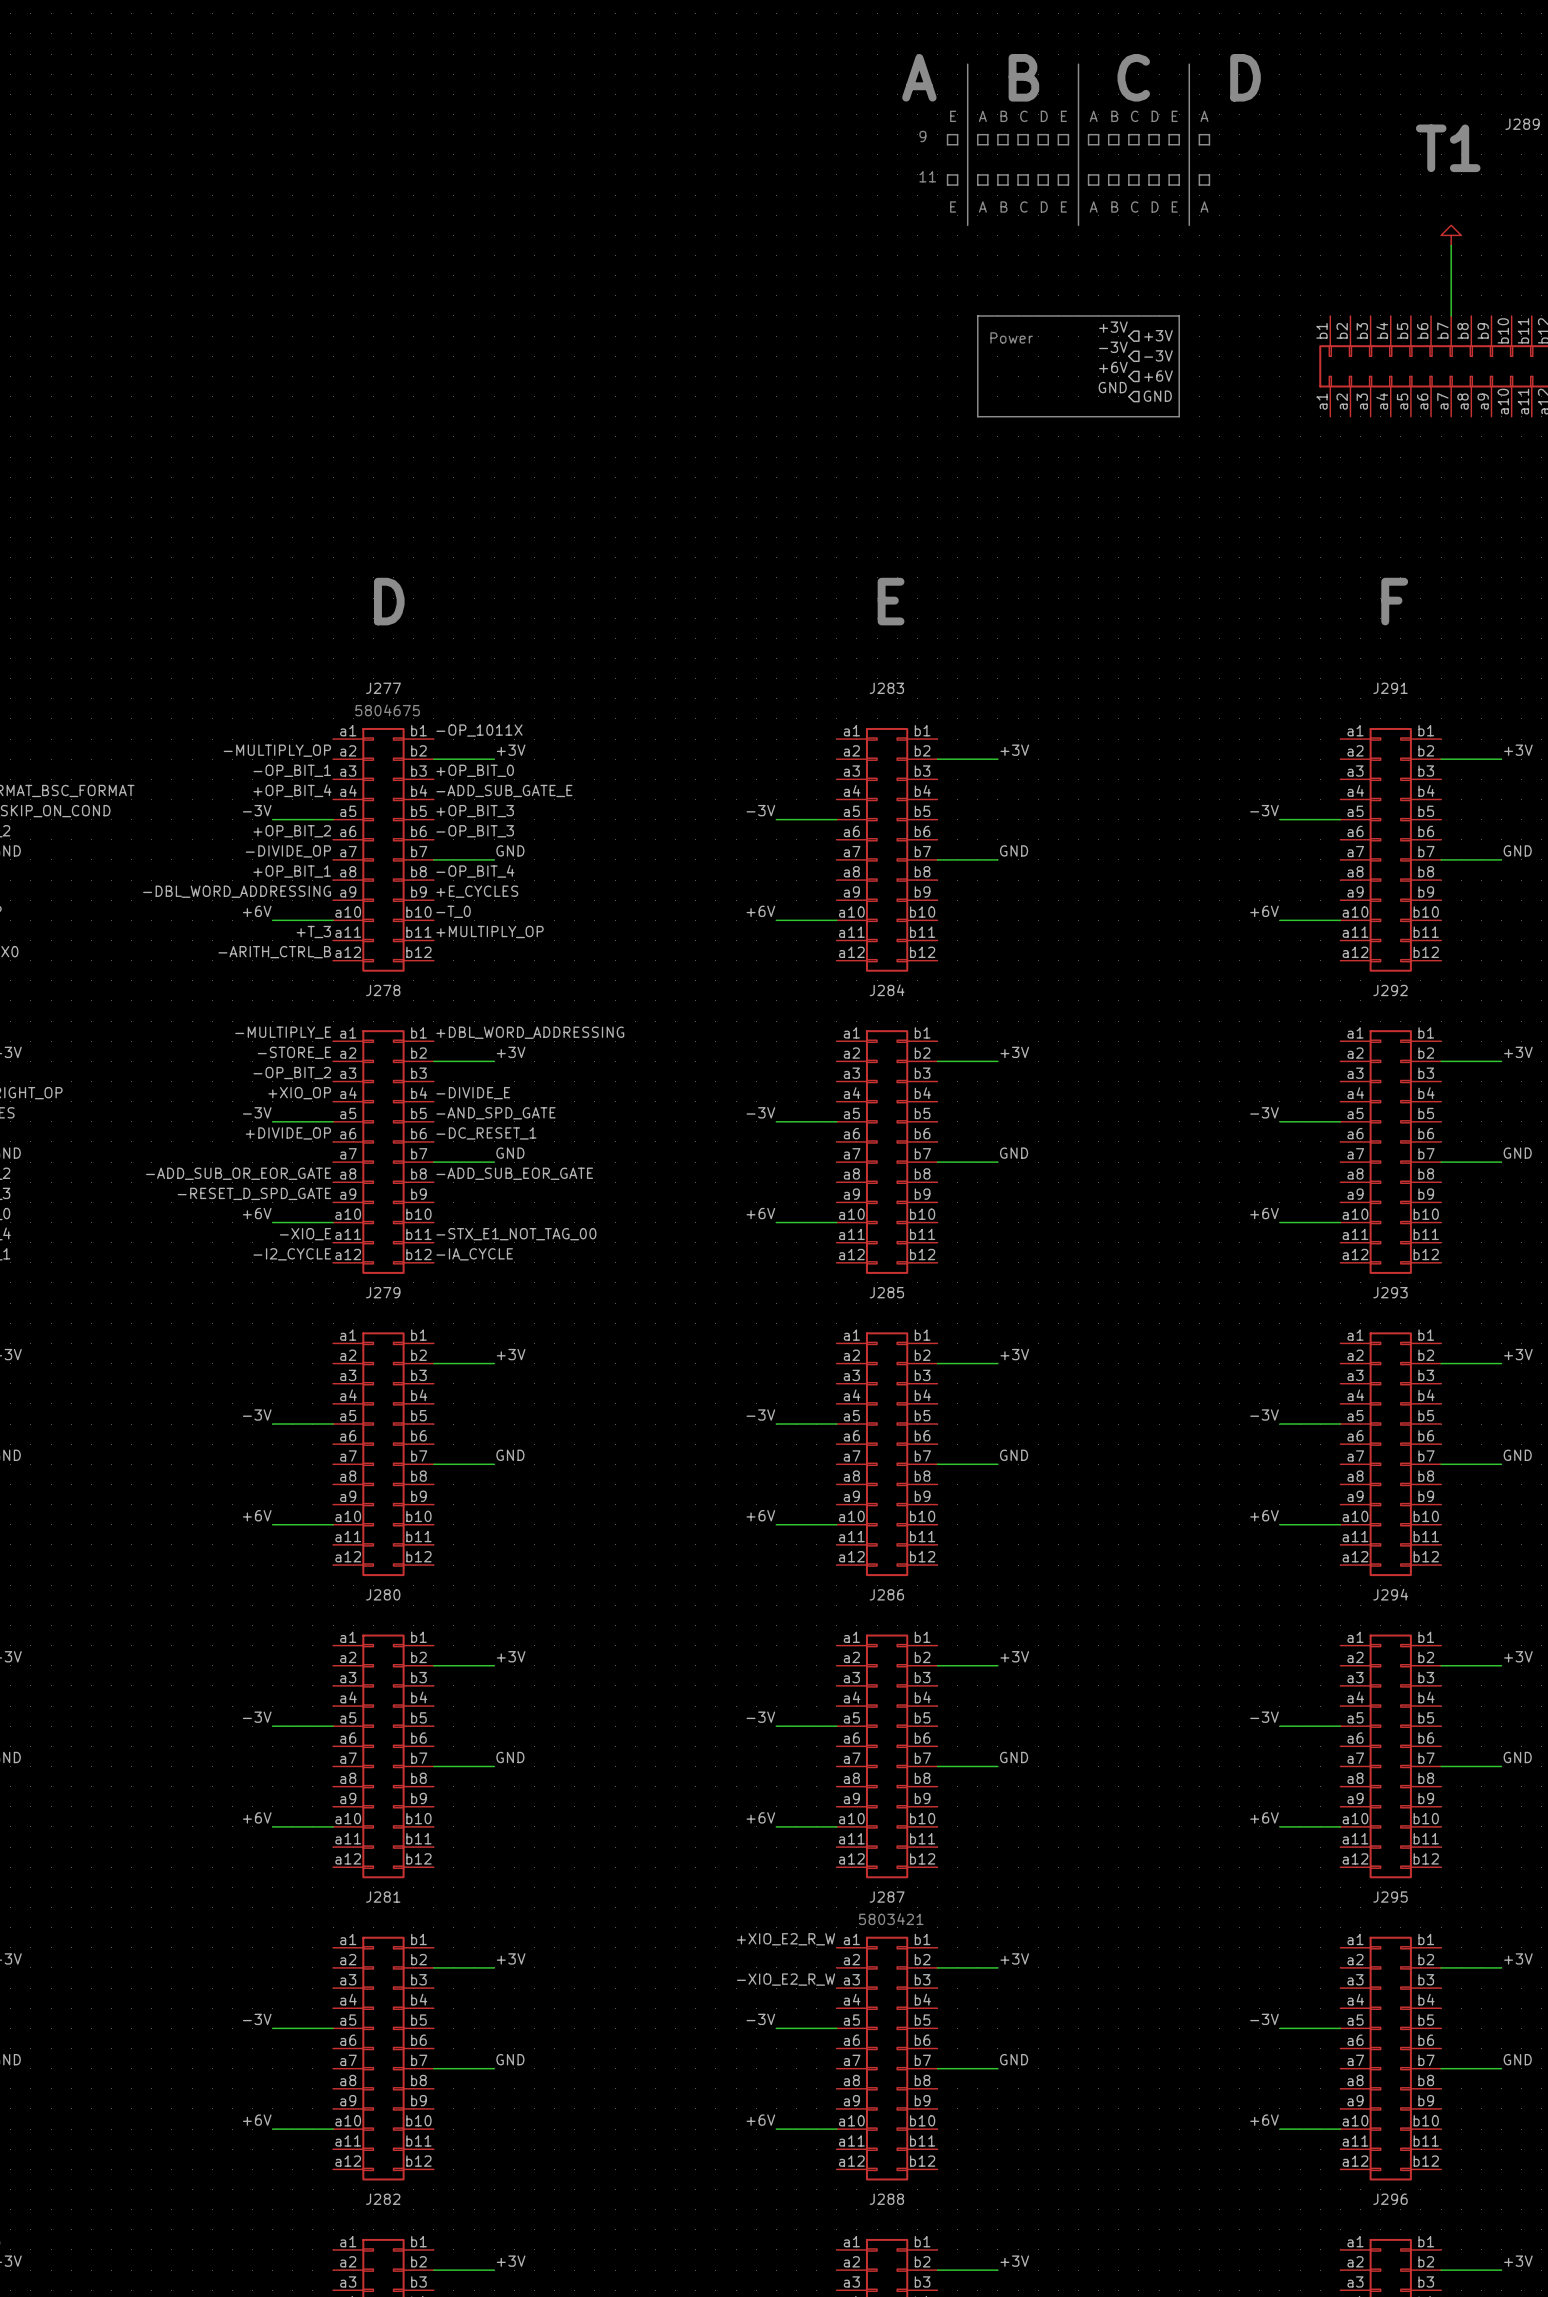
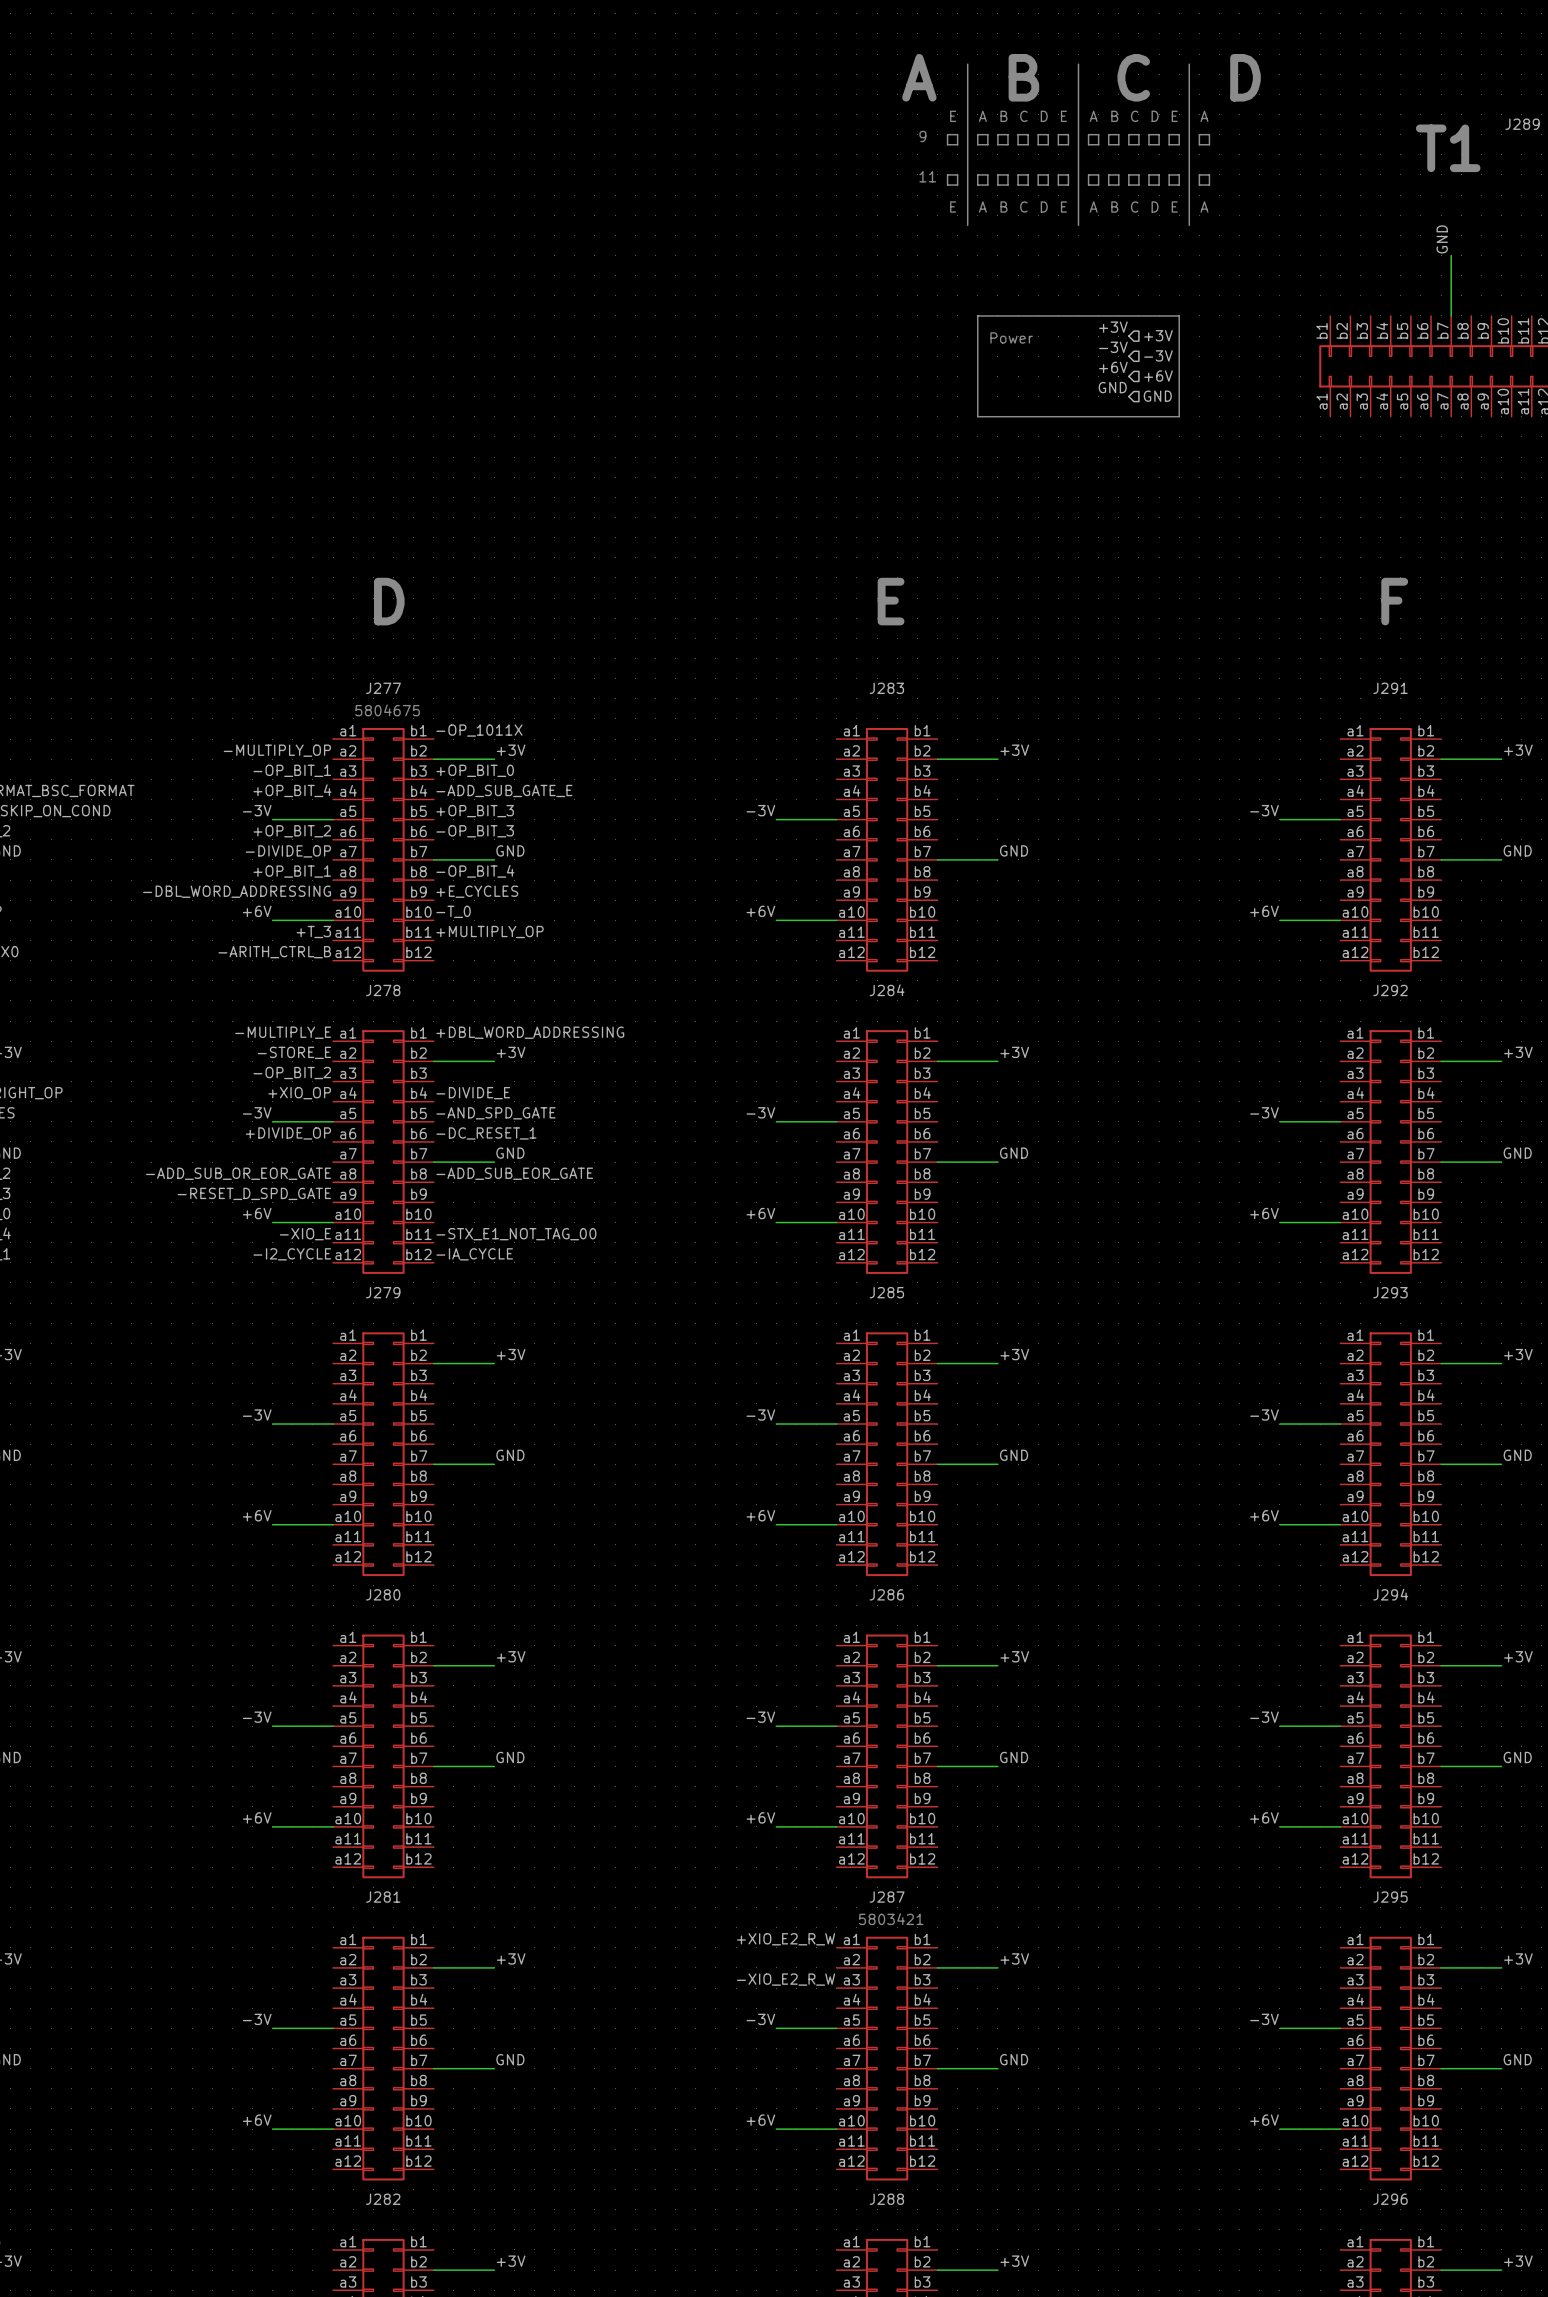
power symbol: (1451, 235) -> none
label: none -> GND (1442, 239)
wire: (1451, 245) (1451, 255) -> none

